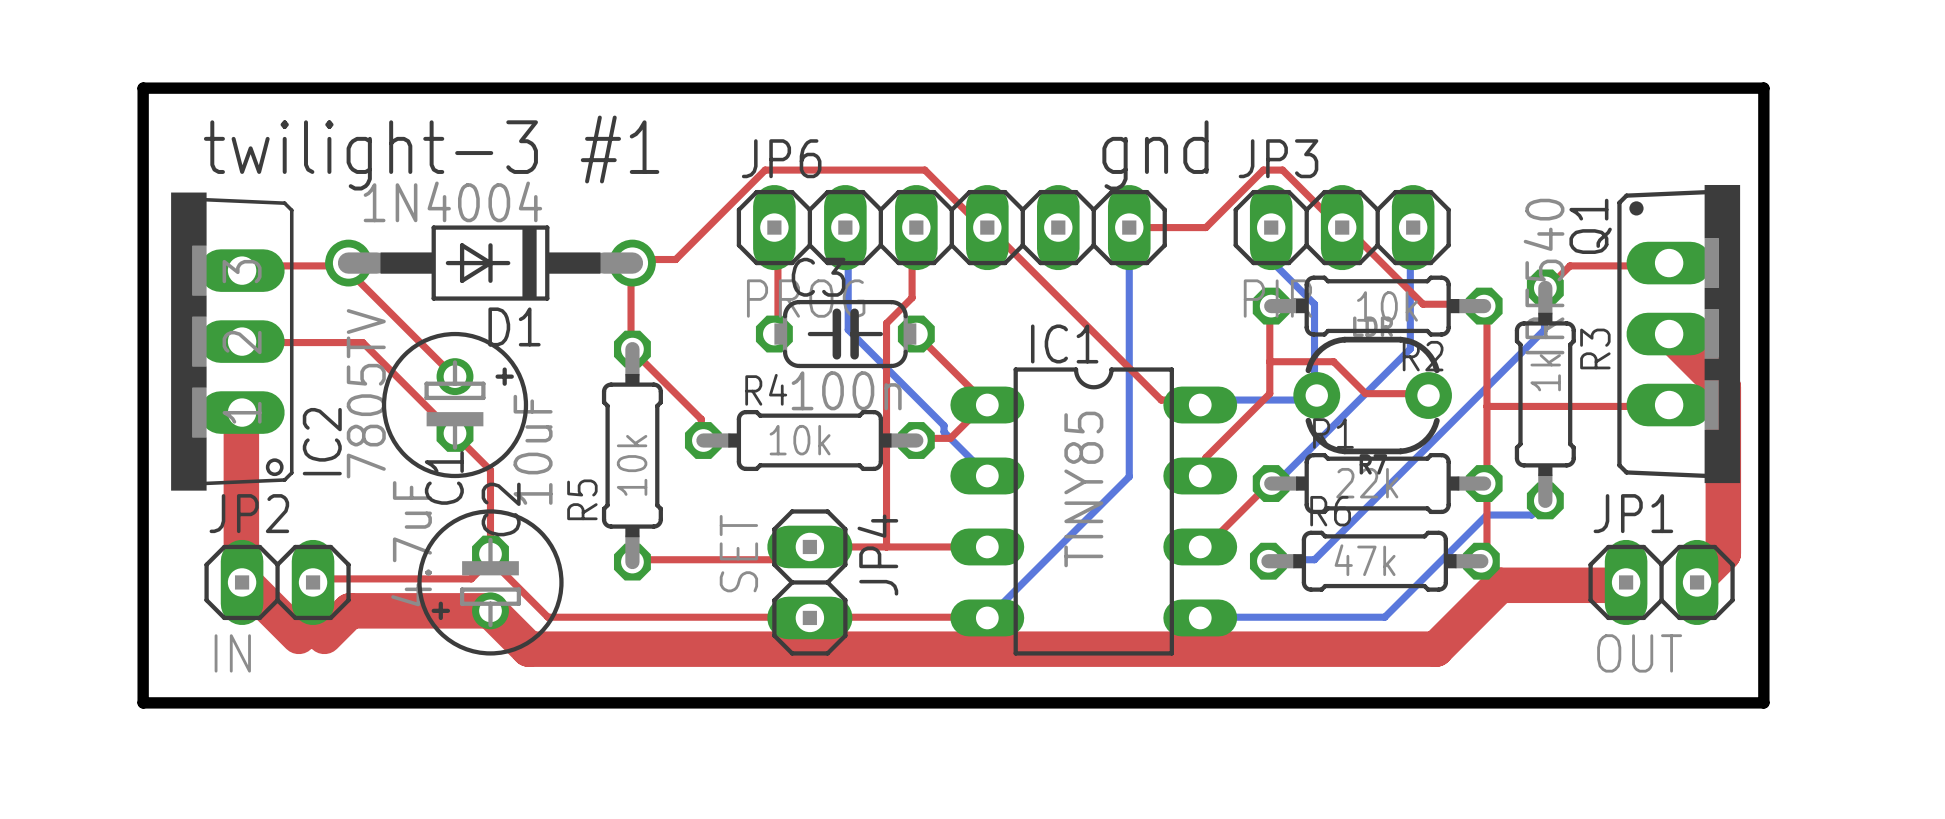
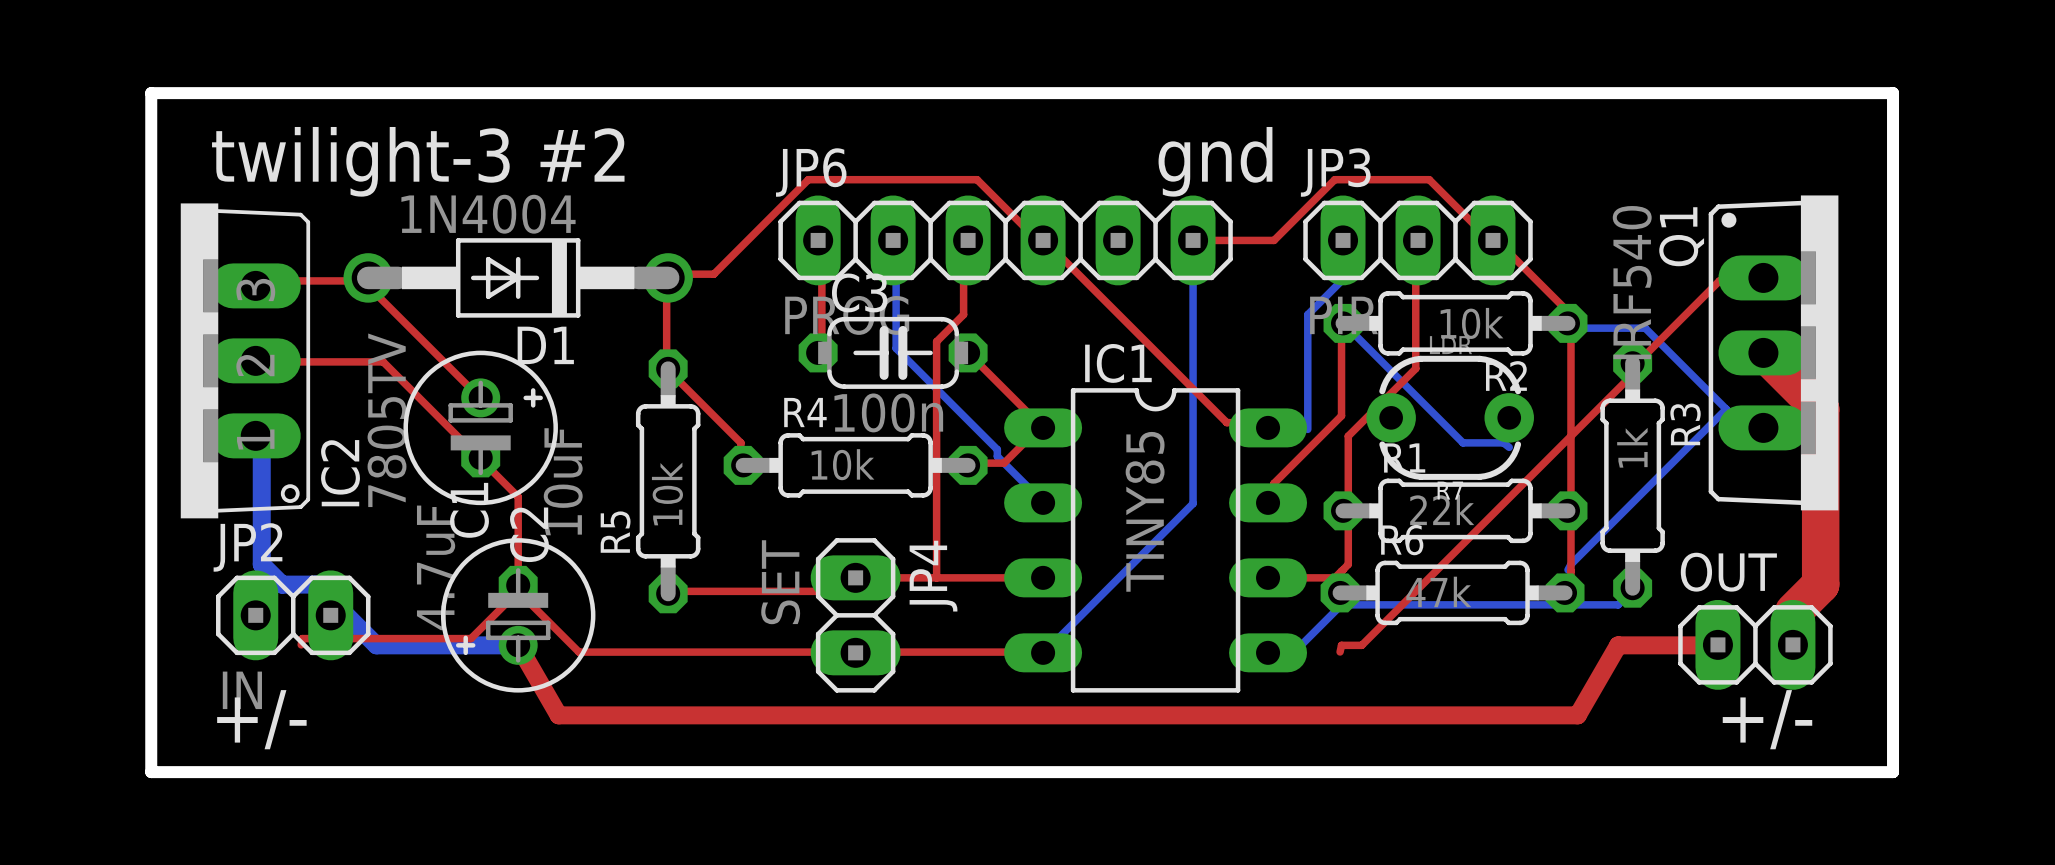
board edge: (1763, 88) (1763, 702) (143, 702) -> (1863, 93) (1893, 93) (1893, 772) (151, 772) (151, 742)
text: twilight-3 #1 (431, 153) -> twilight-3 #2 (418, 161)
top track: (1282, 170) (1340, 227) -> none
bottom track: (1271, 227) (1276, 227) (1276, 265) (1314, 304) (1314, 393) (1316, 395) (1314, 400) (1205, 400) (1200, 405) -> (1343, 240) (1341, 280) (1307, 314) (1307, 429)
top track: (1342, 227) (1346, 227) (1423, 304) (1480, 304) -> (1355, 179) (1429, 179) (1490, 240) (1496, 240) (1564, 307) (1564, 321)
bottom track: (1413, 227) (1410, 227) (1410, 348) (1276, 483) (1271, 483) -> none
top track: (1627, 265) (1570, 265) (1550, 285) (1545, 287) -> (1719, 280) (1638, 361) (1632, 363) (1638, 368) (1361, 645) (1341, 645) (1340, 651)
bottom track: (1545, 287) (1544, 329) (1314, 559) (1268, 561) -> none
bottom track: none -> (1343, 323) (1463, 442) (1503, 442) (1509, 447)
bottom track: none -> (1567, 323) (1570, 328) (1645, 328) (1739, 422) (1759, 422) (1763, 427)
top track: (1269, 361) (1333, 361) (1365, 393) (1423, 393) (1428, 395) -> none
bottom track: none -> (1726, 409) (1570, 564) (1567, 569)
R3 position: (1545, 394) -> (1632, 475)
top track: (1669, 405) (1486, 406) -> none
top track: (242, 412) (242, 582) (247, 585) (298, 636) (324, 636) (349, 610) (490, 610) (528, 649) (1435, 649) (1499, 585) (1621, 585) (1626, 582) -> none
bottom track: none -> (255, 435) (261, 436) (261, 564) (281, 584) (315, 584) (376, 645) (518, 645)
top track: (1271, 483) (1205, 546) -> (1415, 240) (1415, 368) (1348, 436) (1348, 564) (1334, 577) (1274, 577)
bottom track: (1545, 500) (1531, 515) (1486, 515) (1384, 617) (1225, 617) -> (1632, 588) (1618, 604) (1341, 604) (1294, 652)
JP1 name: JP1 (1633, 513) -> OUT (1728, 572)
top track: (471, 578) (318, 578) (313, 582) -> (497, 611) (470, 638) (302, 638) (301, 644)
JP1 position: (1661, 582) -> (1755, 644)
top track: none -> (1717, 644) (1618, 645) (1577, 715) (558, 715) (518, 645)
JP1 value: OUT (1639, 653) -> none
text: none -> +/- (261, 719)
text: none -> +/- (1767, 719)

